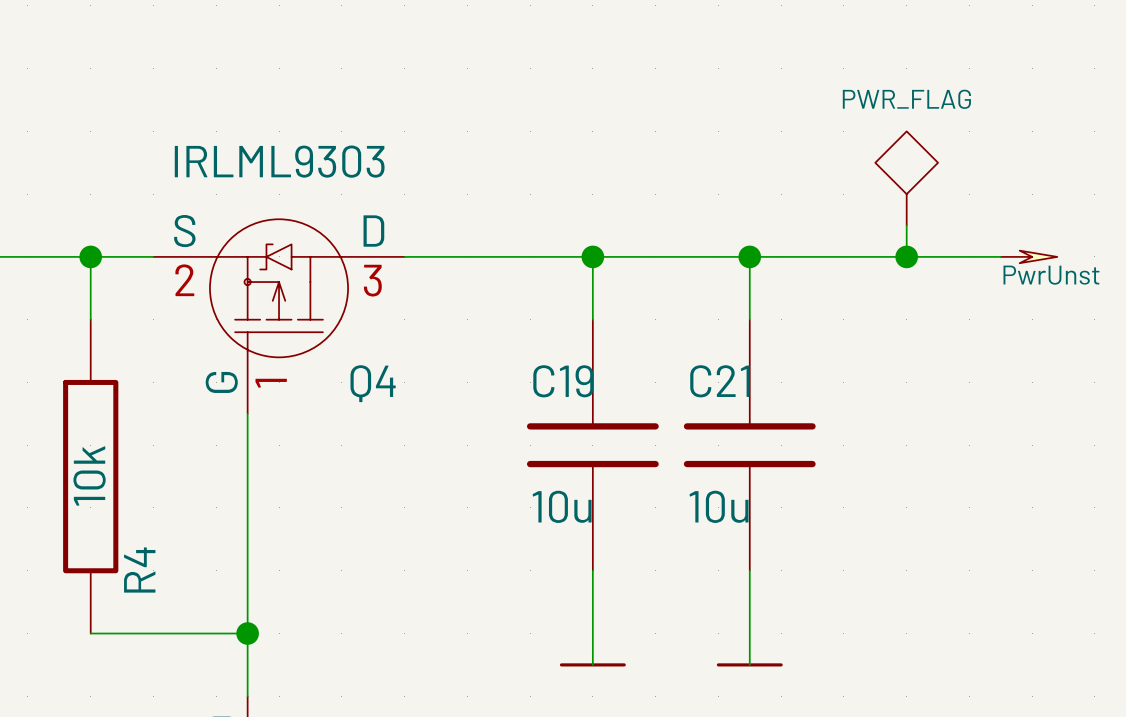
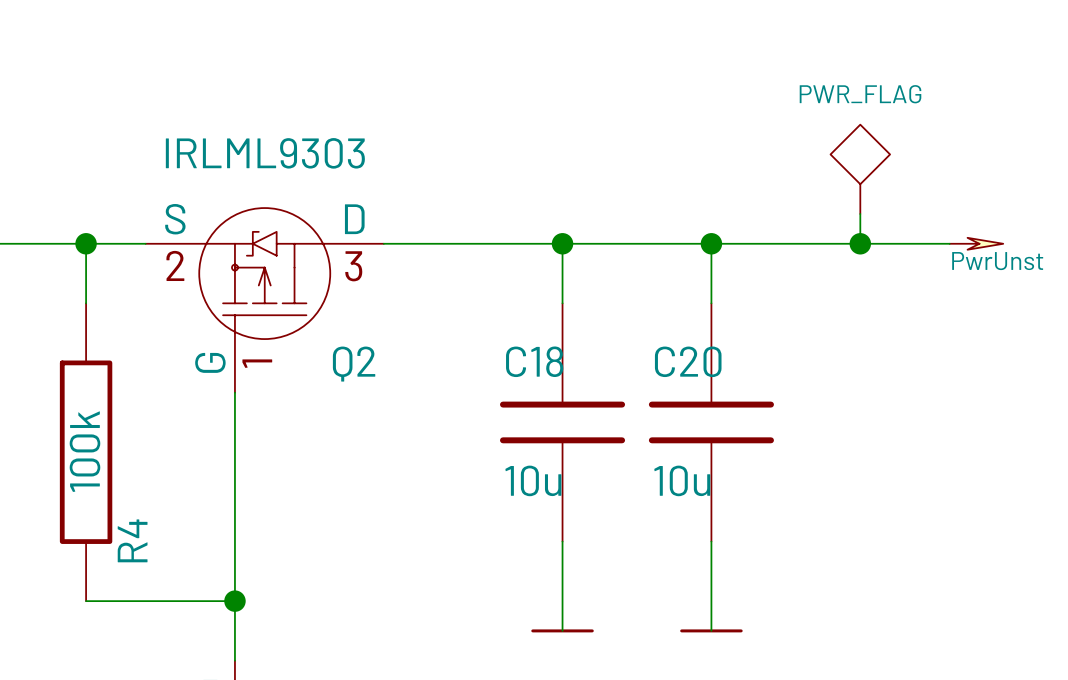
C19 name: C19 (563, 381) -> C18 (534, 361)
C21 name: C21 (720, 381) -> C20 (688, 361)
Q4 name: Q4 (373, 383) -> Q2 (354, 364)
R4 value: 10k (89, 475) -> 100k (84, 451)

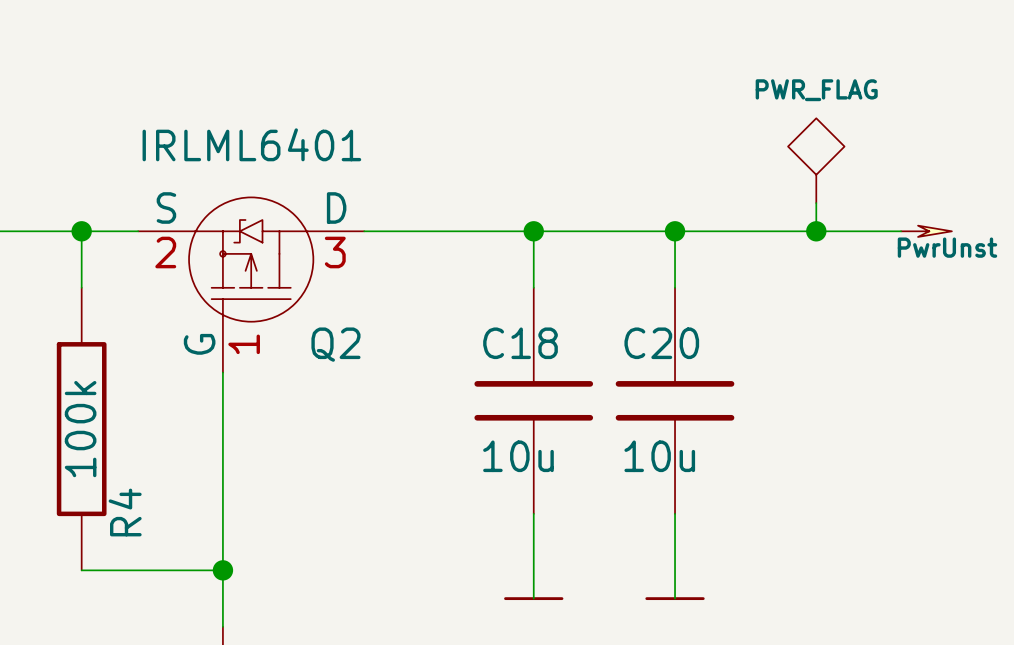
Q2 value: IRLML9303 (265, 153) -> IRLML6401 (251, 144)

